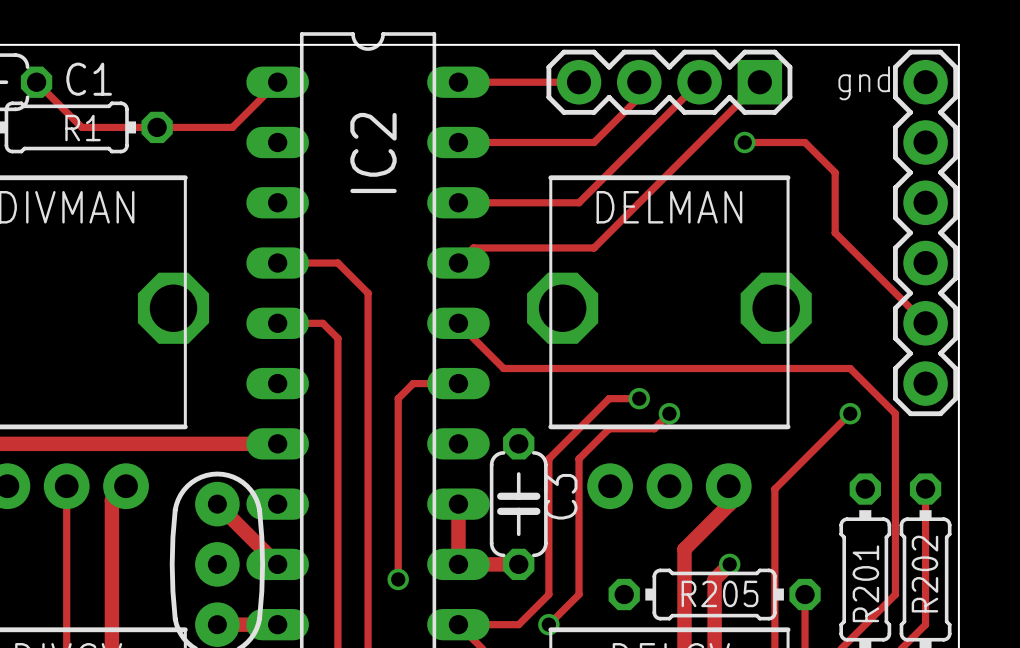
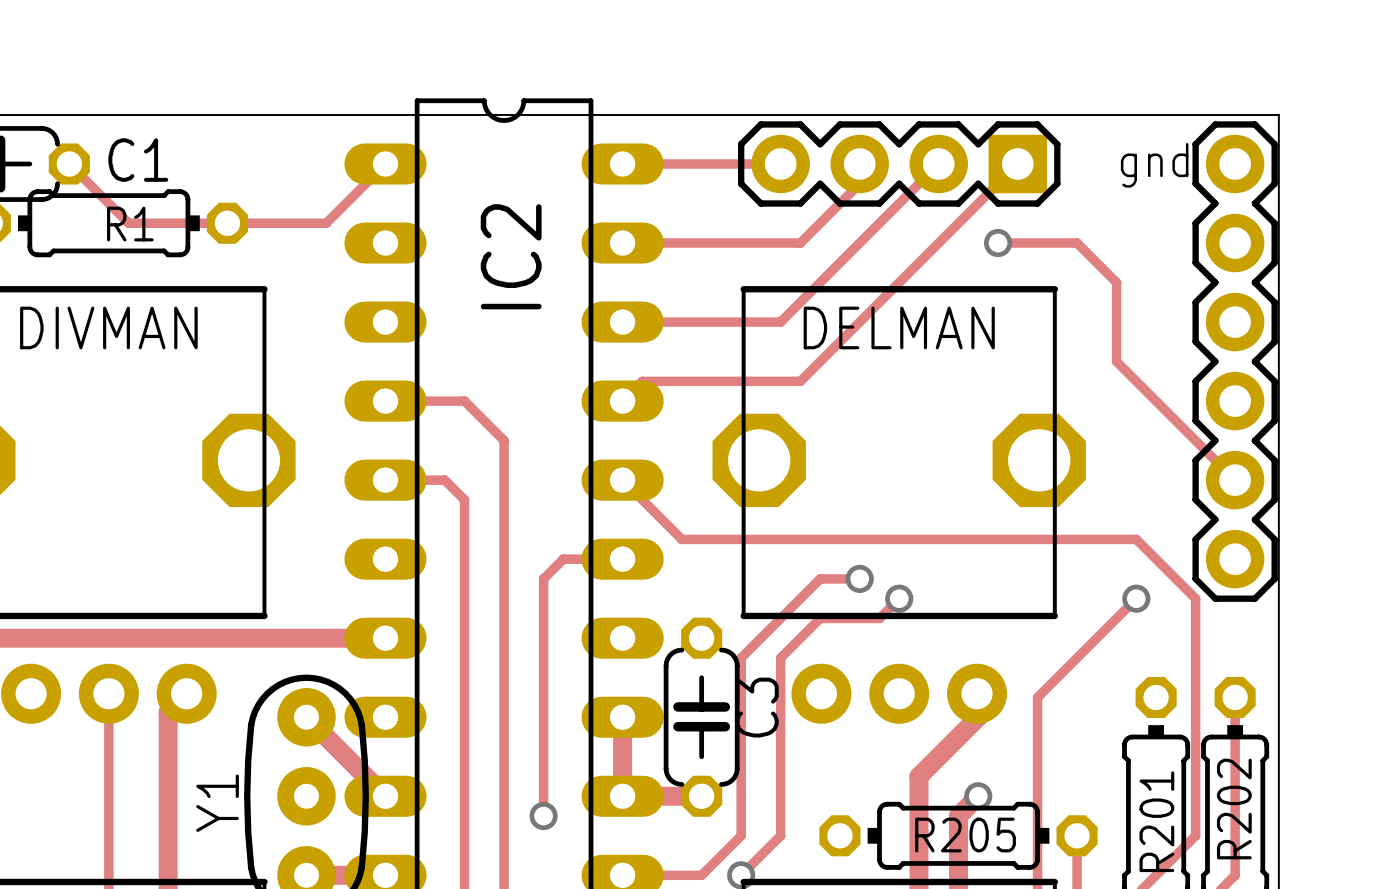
text: none -> Y1 (217, 803)

